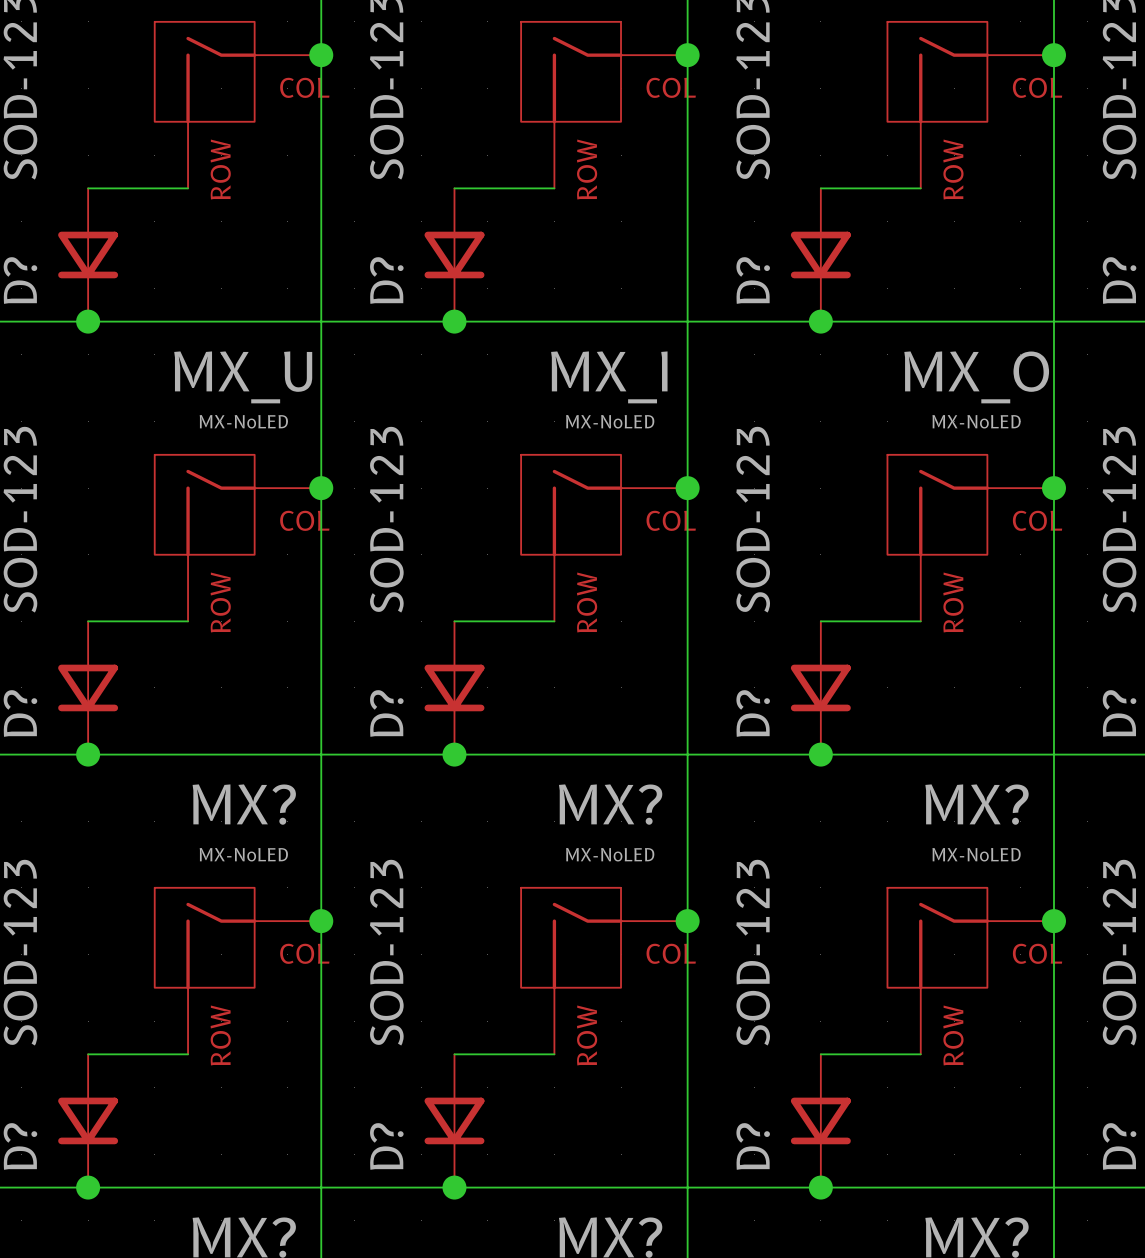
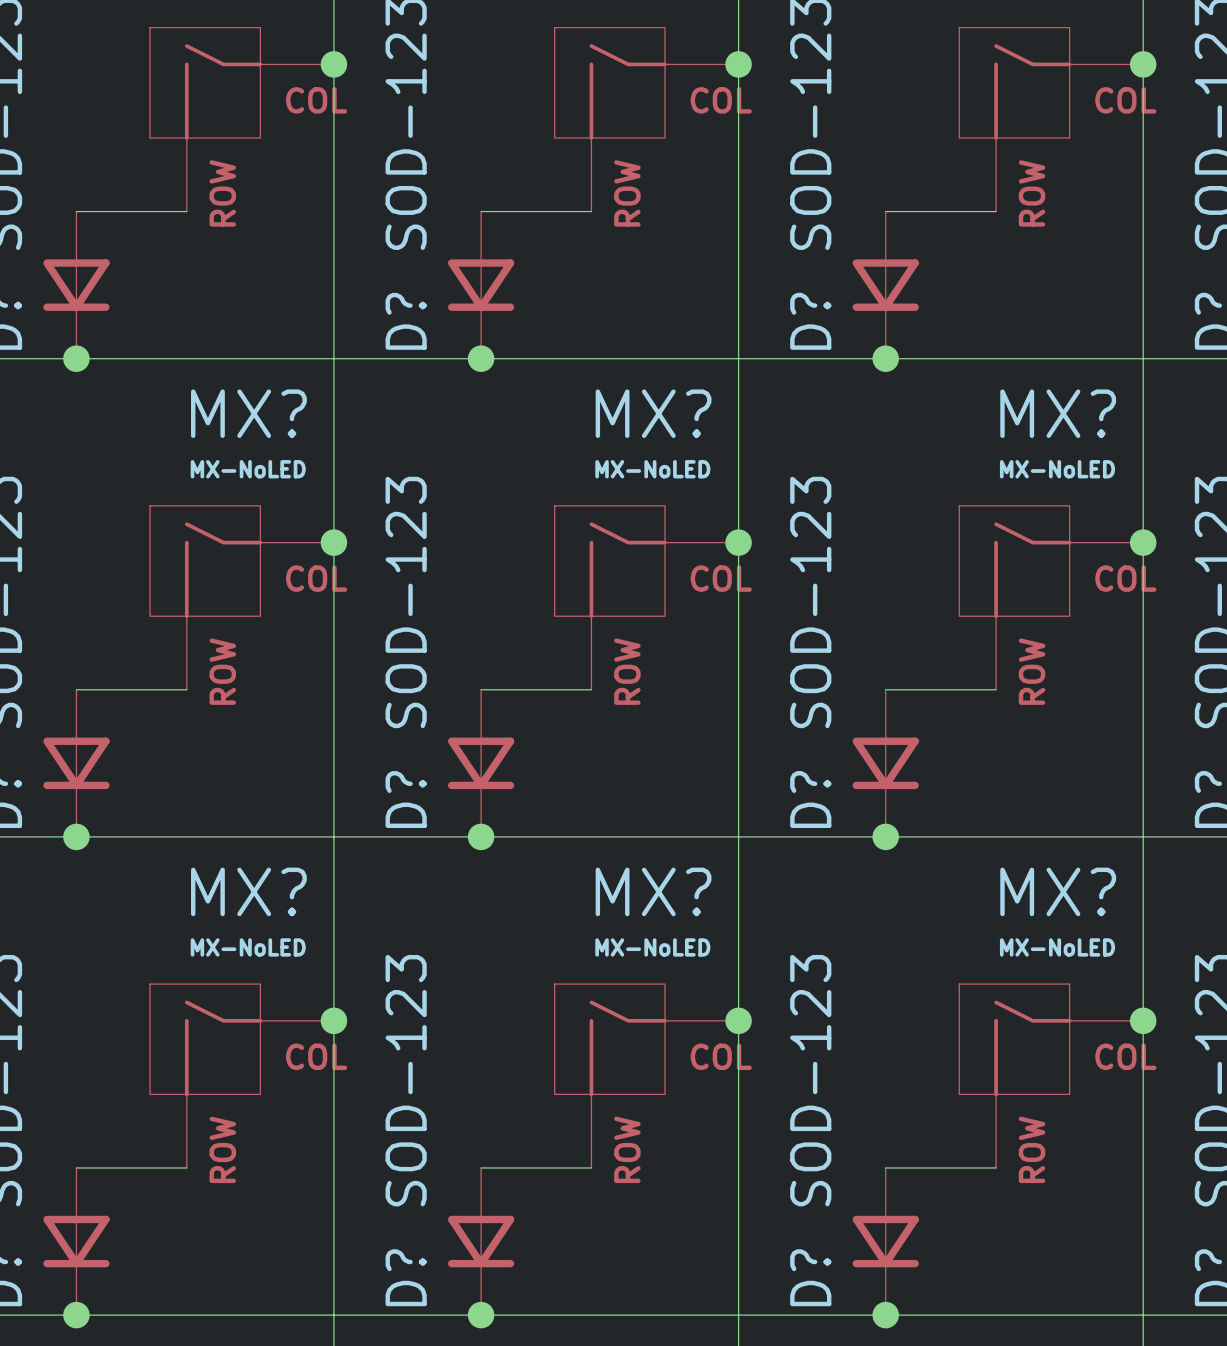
MX_U name: MX_U (243, 377) -> MX? (248, 413)
MX_I name: MX_I (609, 377) -> MX? (653, 413)
MX_O name: MX_O (976, 377) -> MX? (1058, 413)

